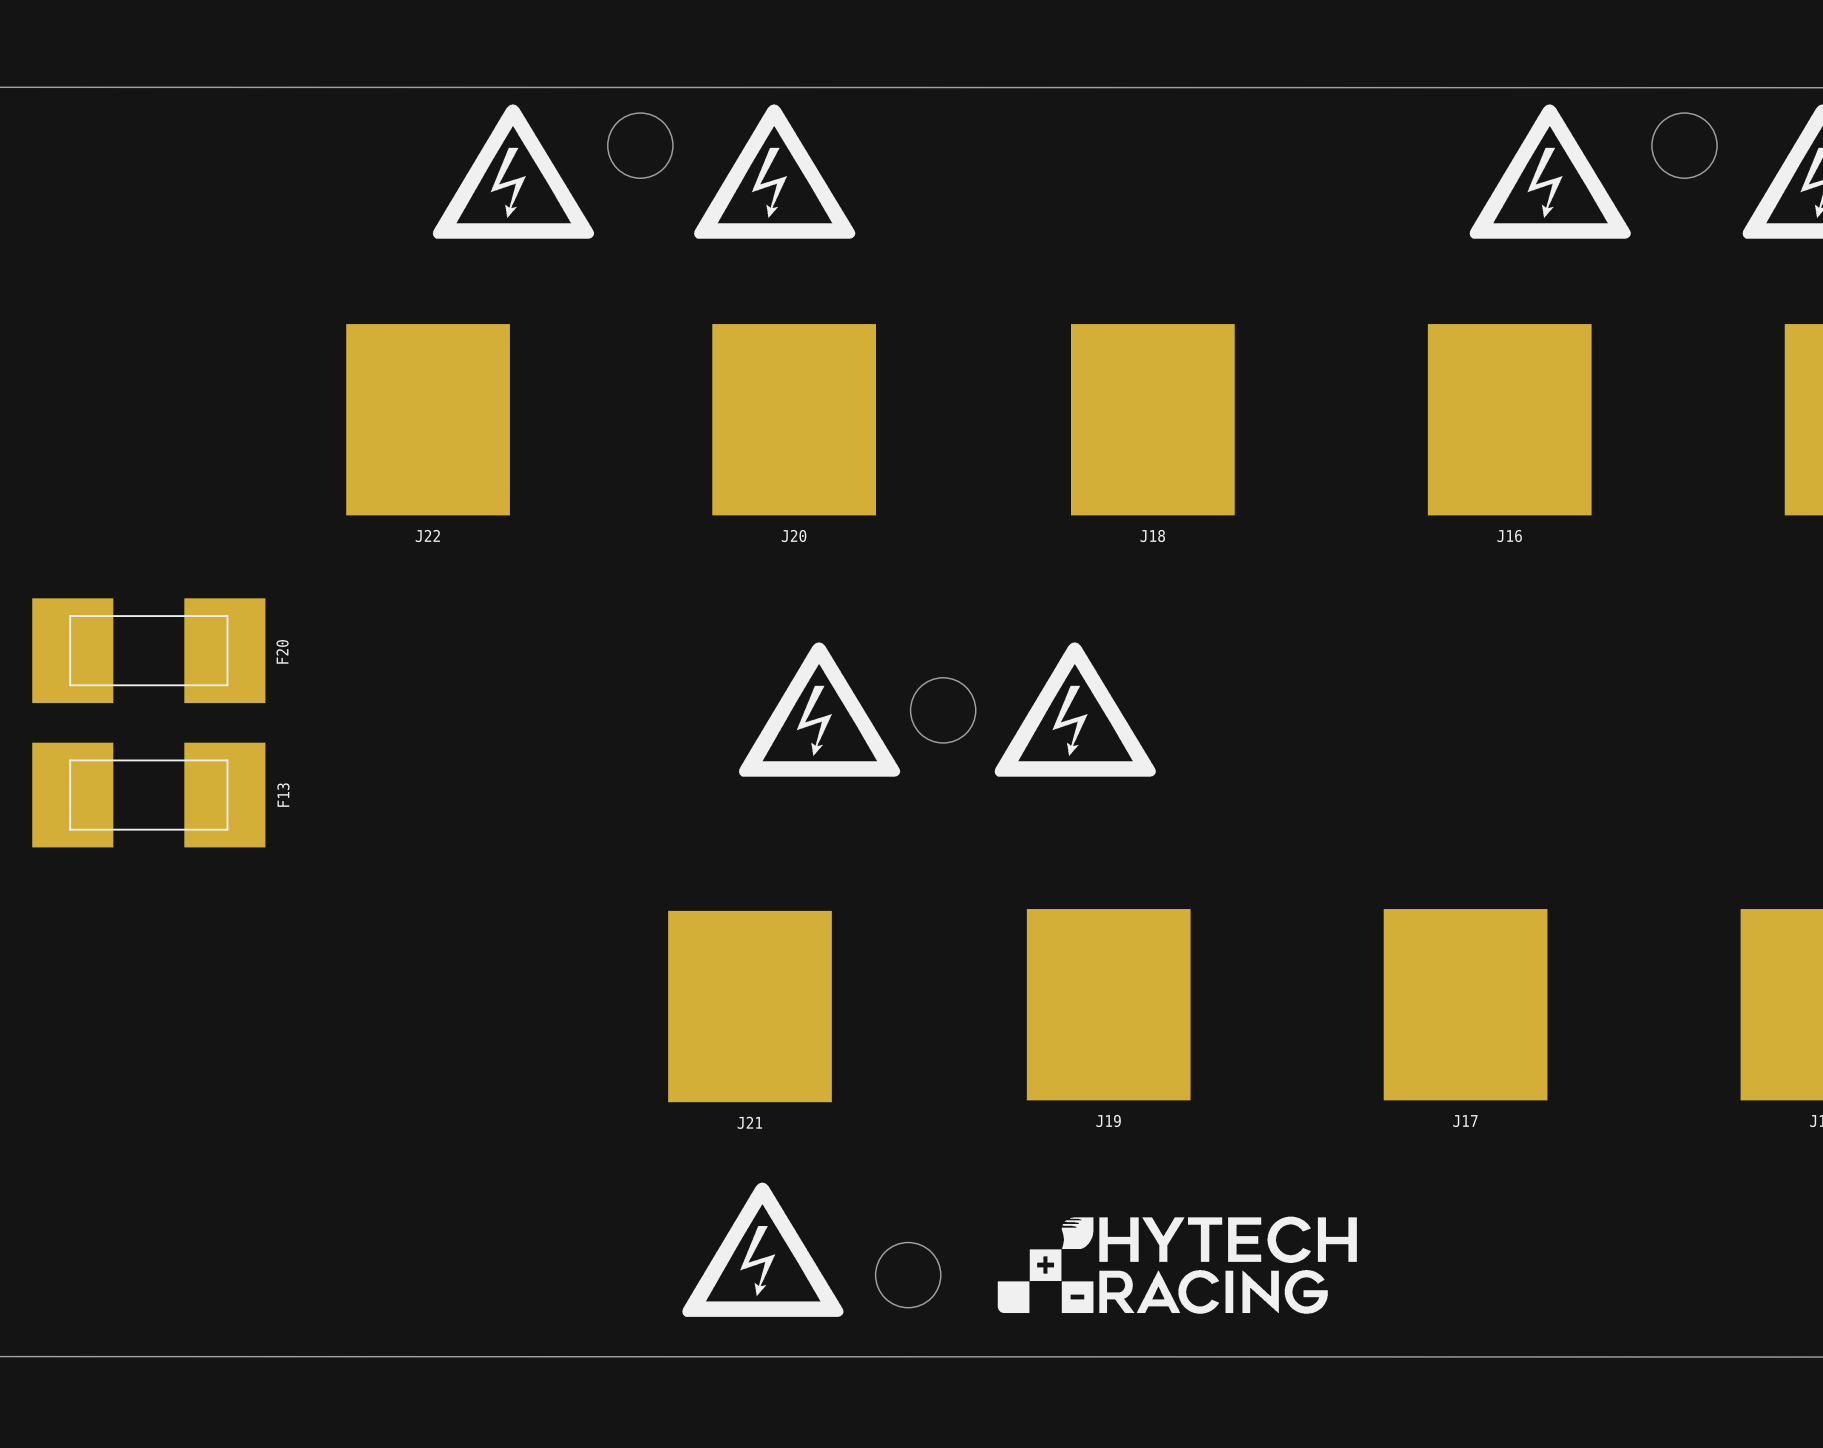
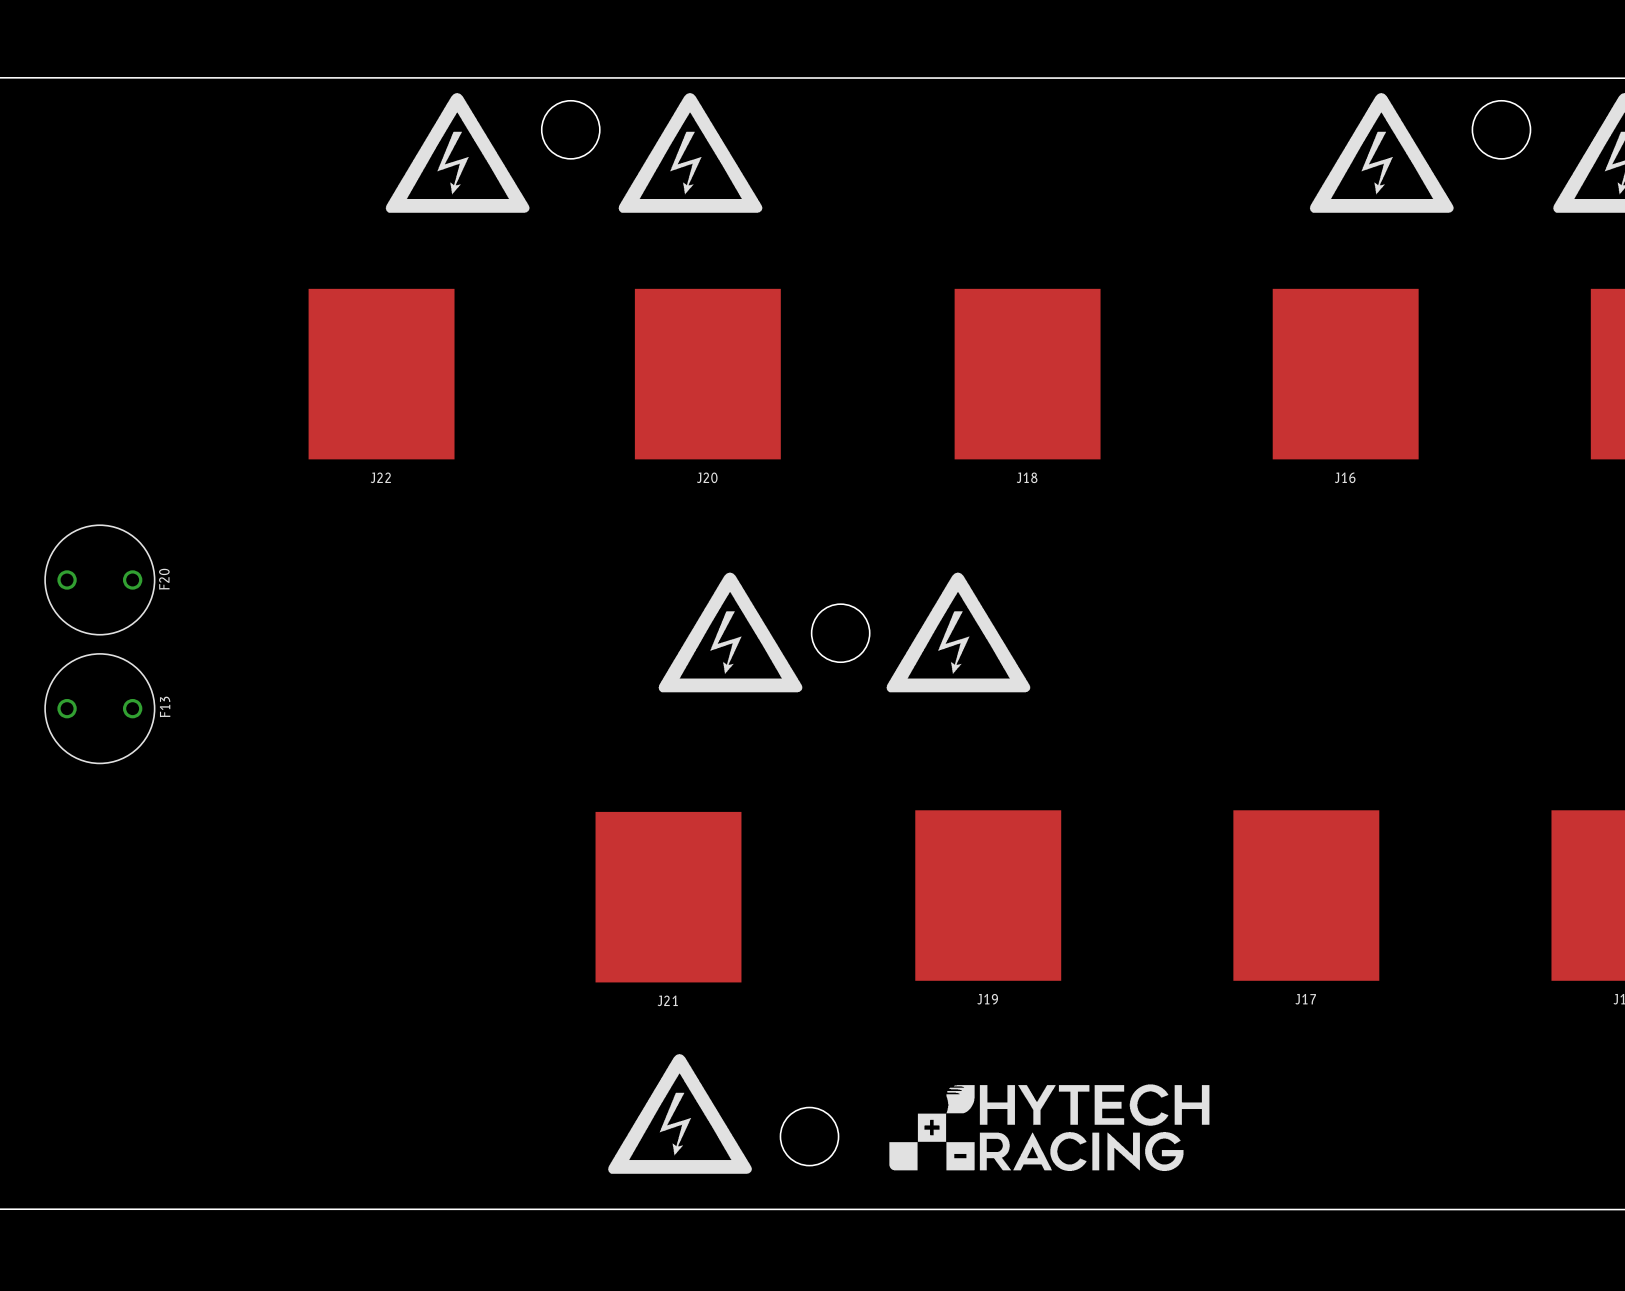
F20 footprint: [32, 598, 266, 704] -> [44, 524, 156, 636]
F20 name position: F20 (282, 651) -> F20 (164, 579)
F13 footprint: [32, 742, 266, 848] -> [44, 653, 156, 765]
F13 name position: F13 (283, 795) -> F13 (165, 706)

